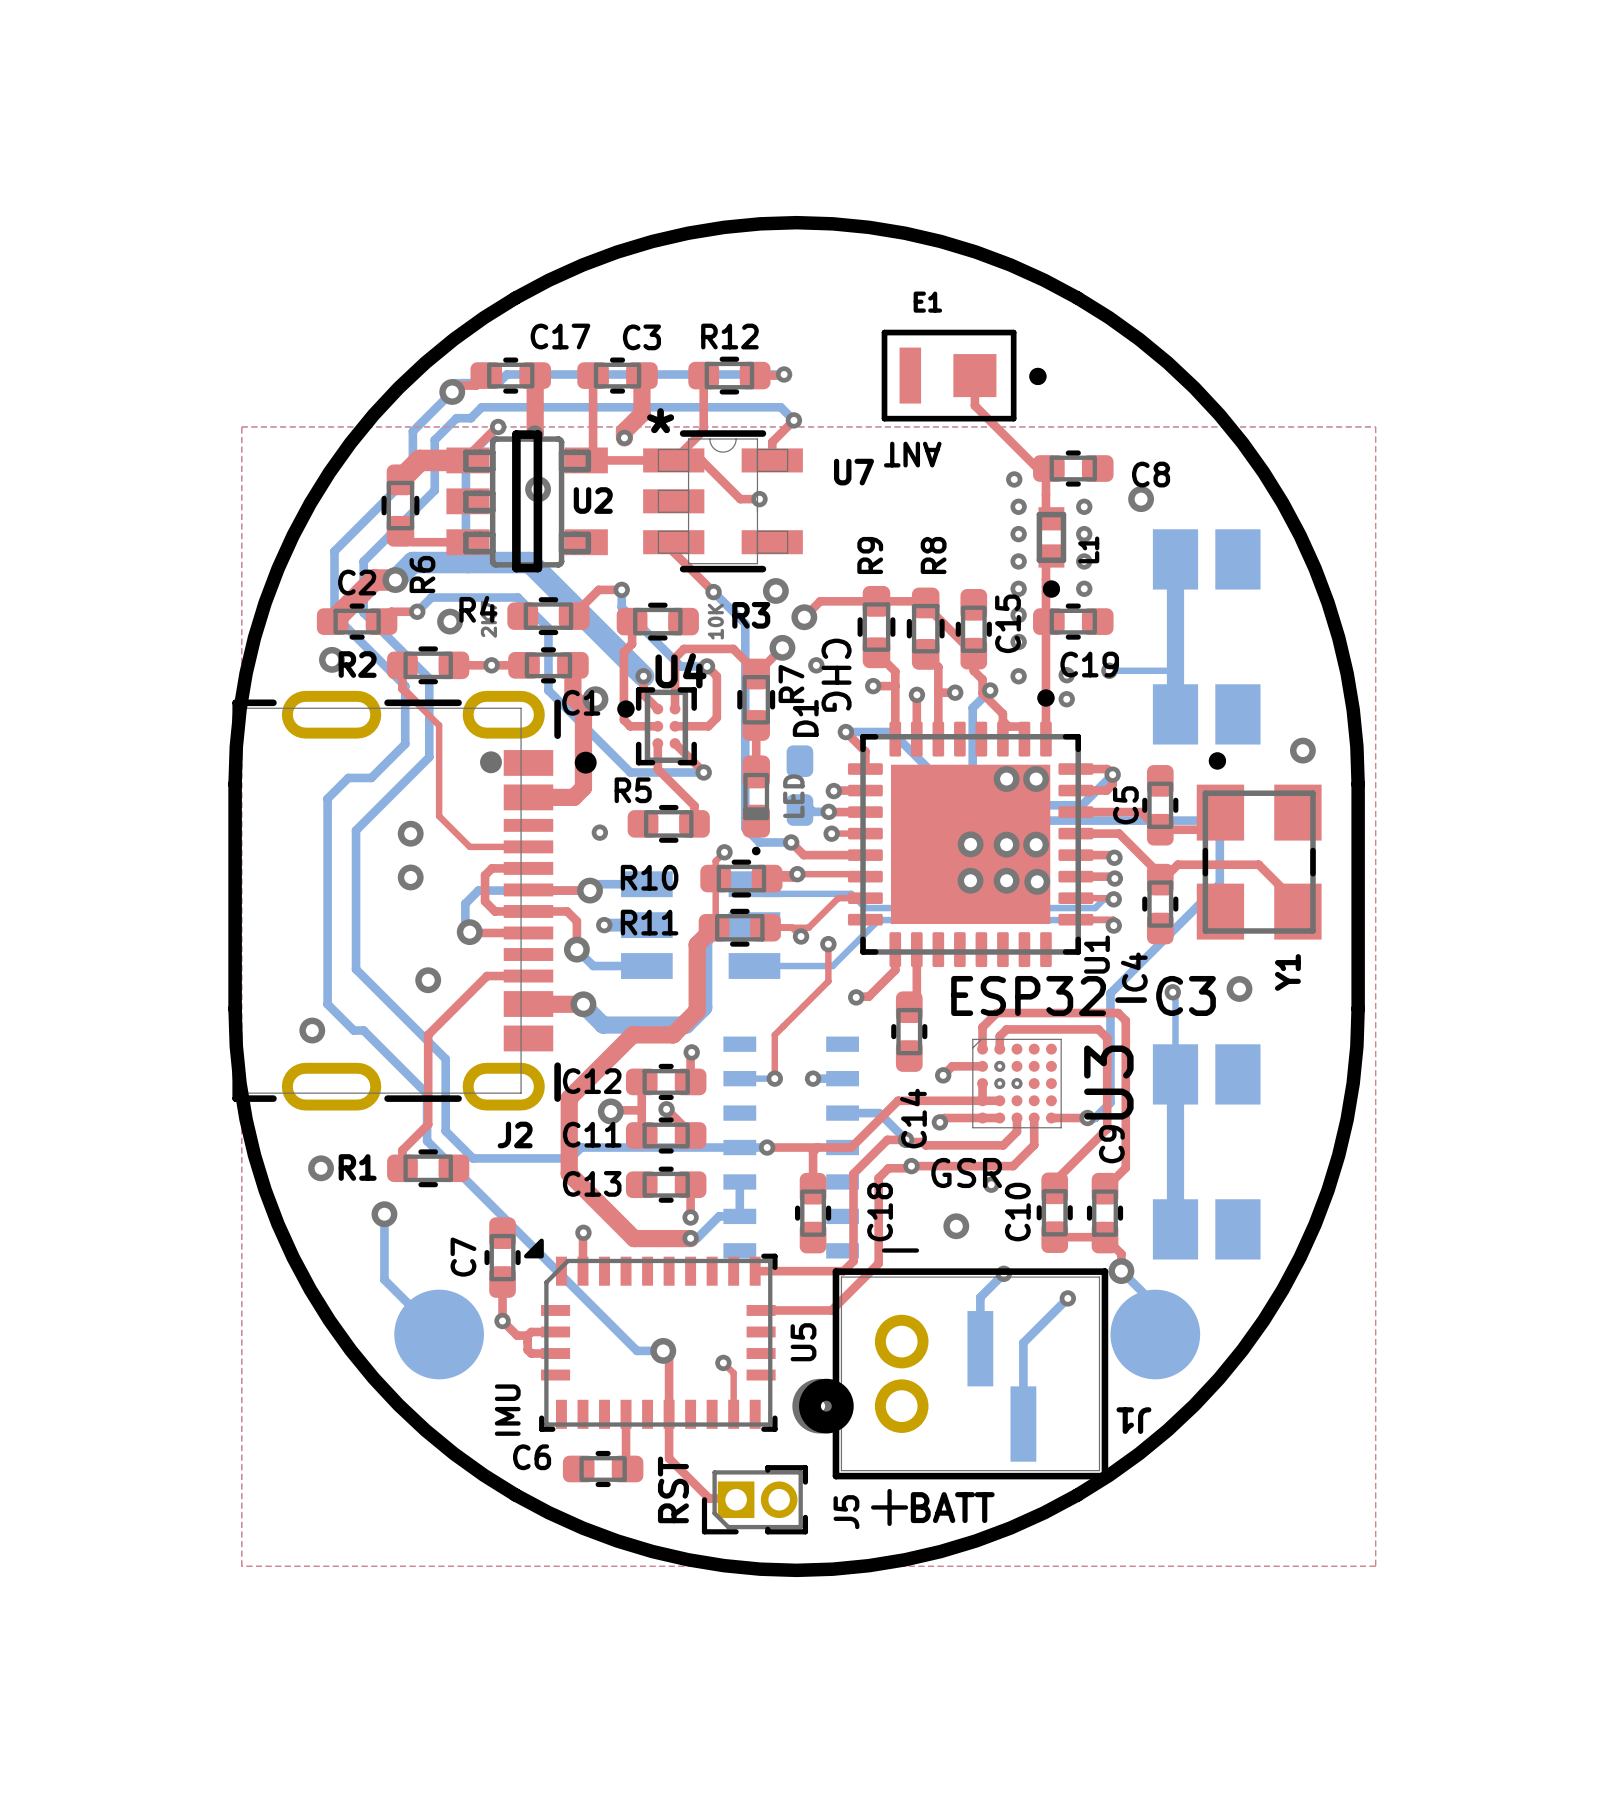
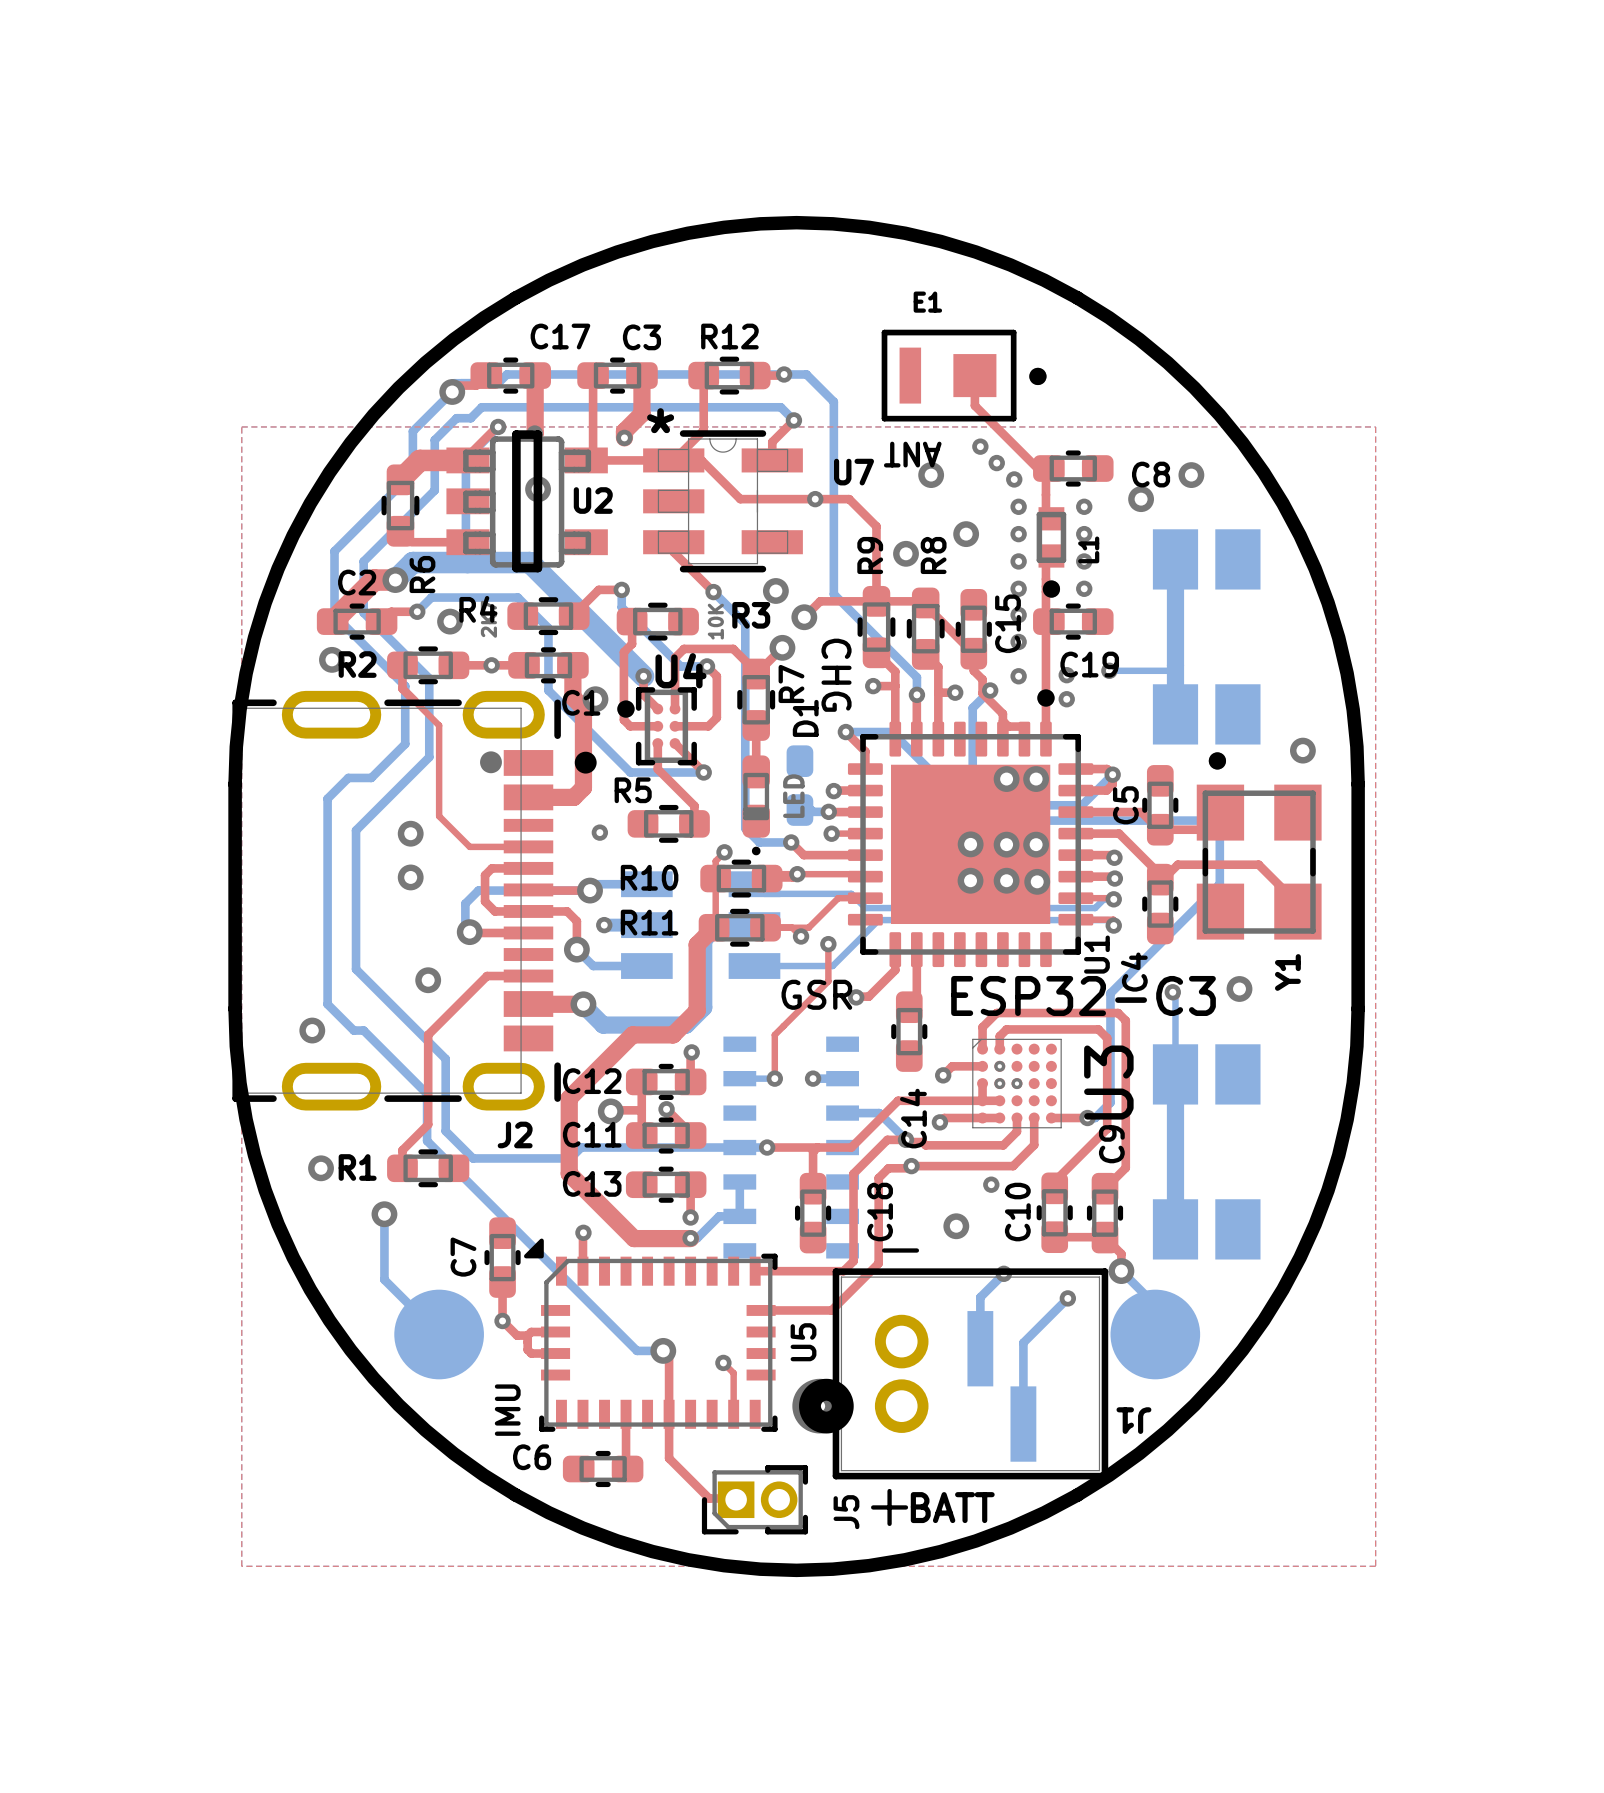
bottom track: none -> (784, 374) (806, 374) (833, 401) (833, 594) (916, 677) (916, 694)
via: none -> (980, 446)
via: none -> (996, 463)
via: none -> (931, 475)
via: none -> (1191, 475)
top track: none -> (759, 499) (849, 499) (876, 526) (876, 601)
via position: (759, 499) -> (815, 499)
via: none -> (966, 534)
via: none -> (906, 553)
via: (816, 665) -> none
text position: GSR (966, 1173) -> GSR (816, 994)
text: RST (673, 1489) -> none

